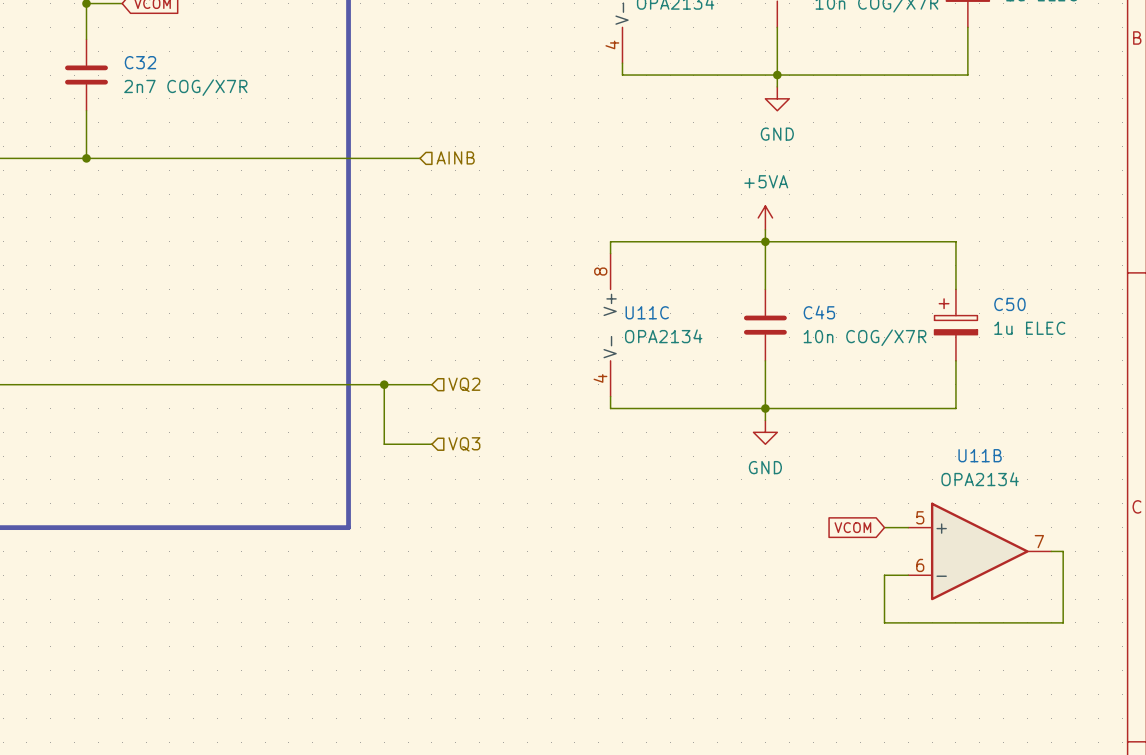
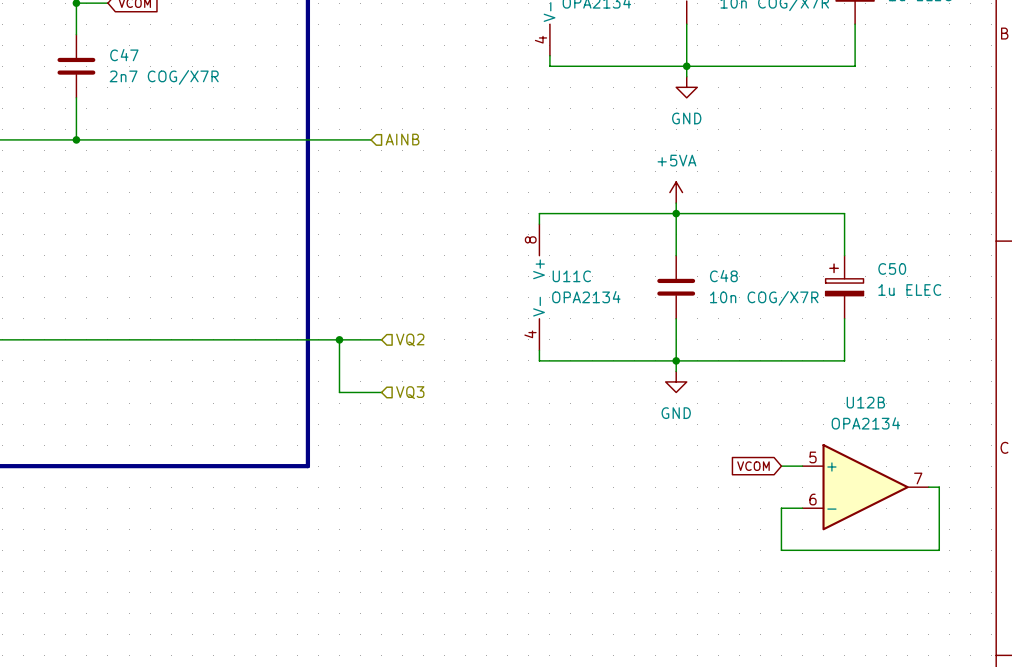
C32 name: C32 (140, 62) -> C47 (124, 55)
C45 name: C45 (819, 312) -> C48 (723, 276)
U11B name: U11B (980, 455) -> U12B (865, 402)

